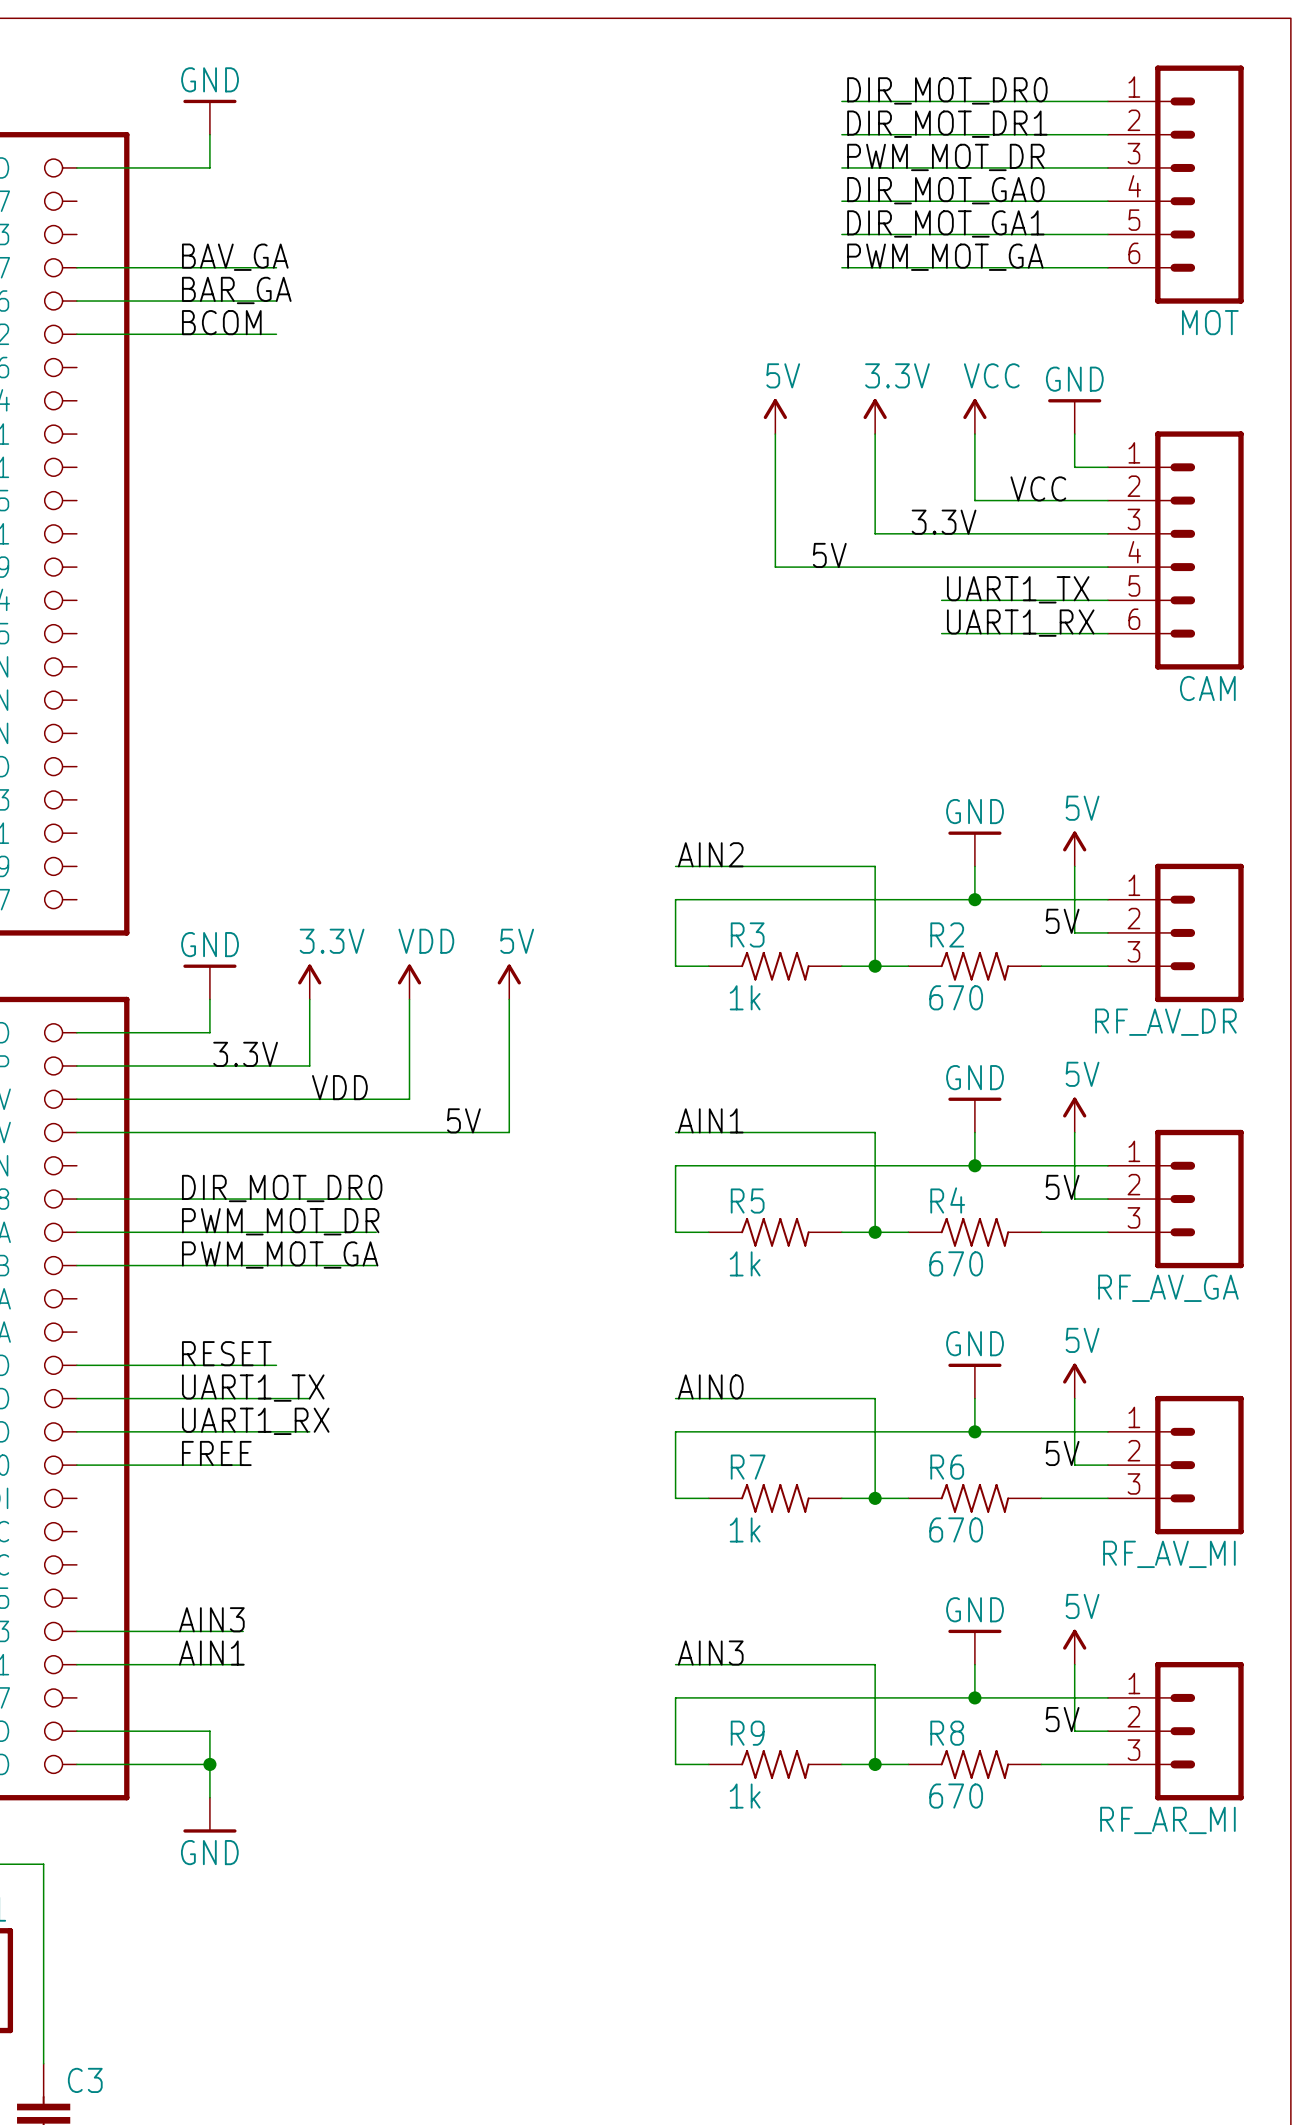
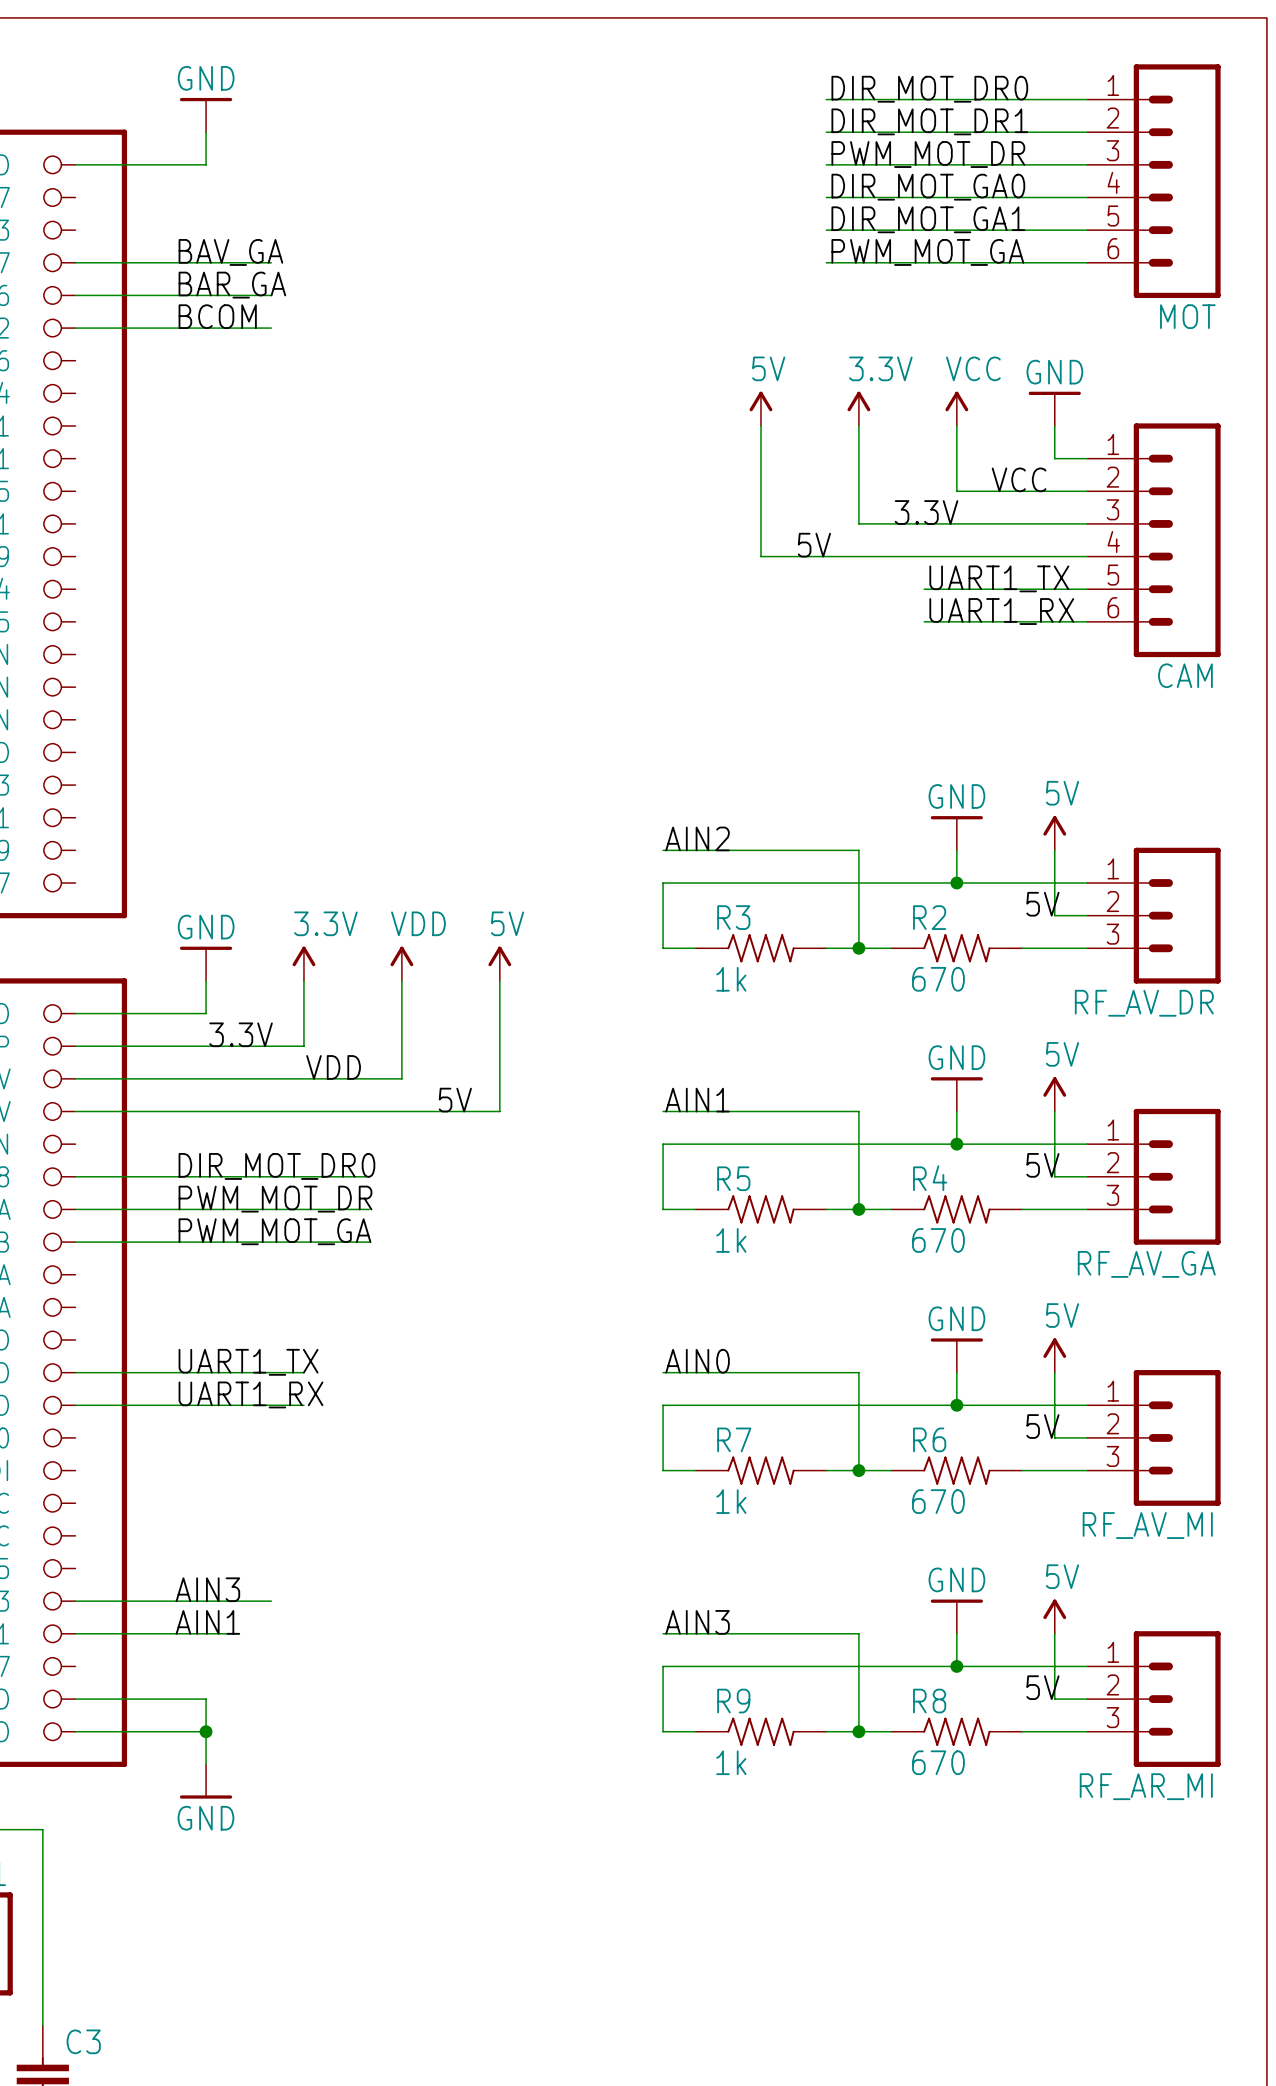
label: RESET (226, 1353) -> none
wire: (76, 1365) (276, 1365) -> none
label: FREE (216, 1453) -> none
wire: (76, 1465) (243, 1465) -> none
wire: none -> (238, 1601) (271, 1601)

